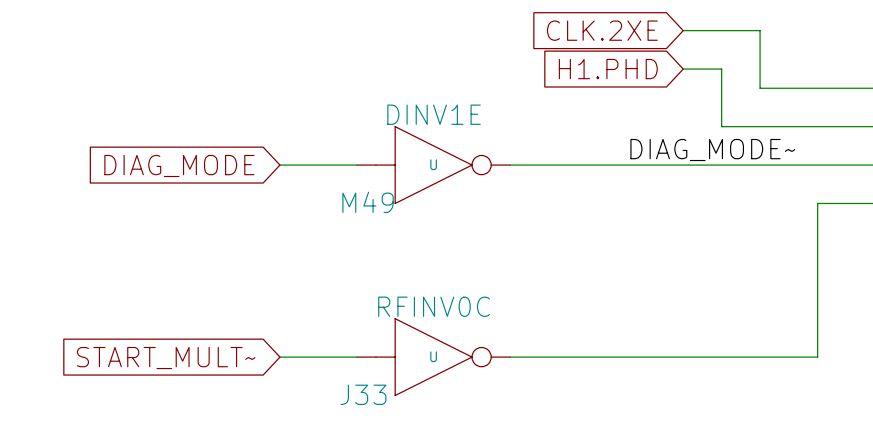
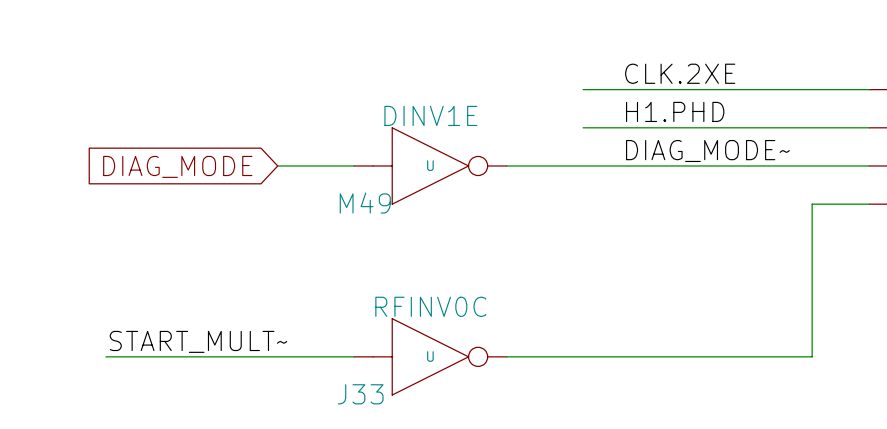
global label: CLK.2XE (602, 30) -> none
wire: (683, 30) (760, 30) (760, 88) -> (583, 89) (754, 89)
global label: H1.PHD (608, 69) -> none
wire: (683, 69) (721, 69) (721, 126) -> (583, 127) (716, 127)
label: none -> CLK.2XE (680, 73)
label: none -> H1.PHD (675, 111)
label: none -> START_MULT~ (198, 341)
wire: none -> (105, 356) (277, 356)
global label: START_MULT~ (166, 358) -> none

